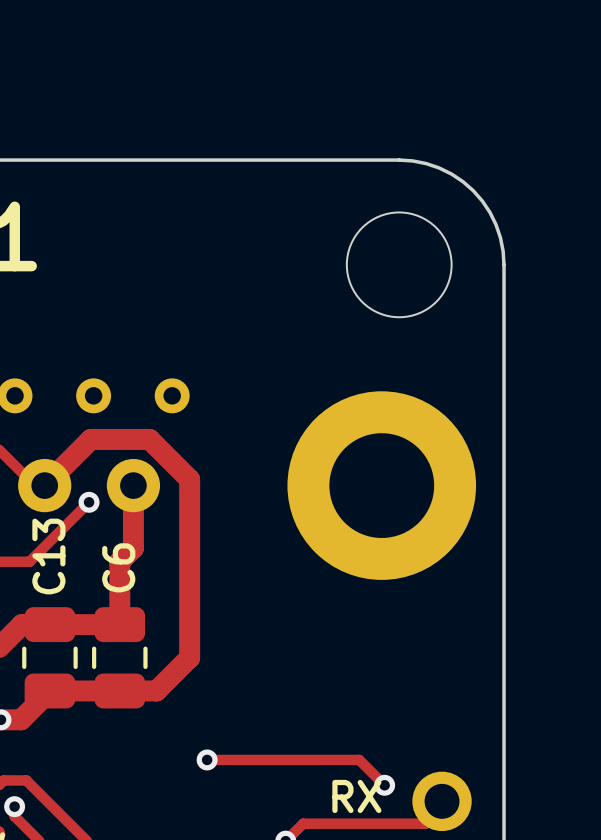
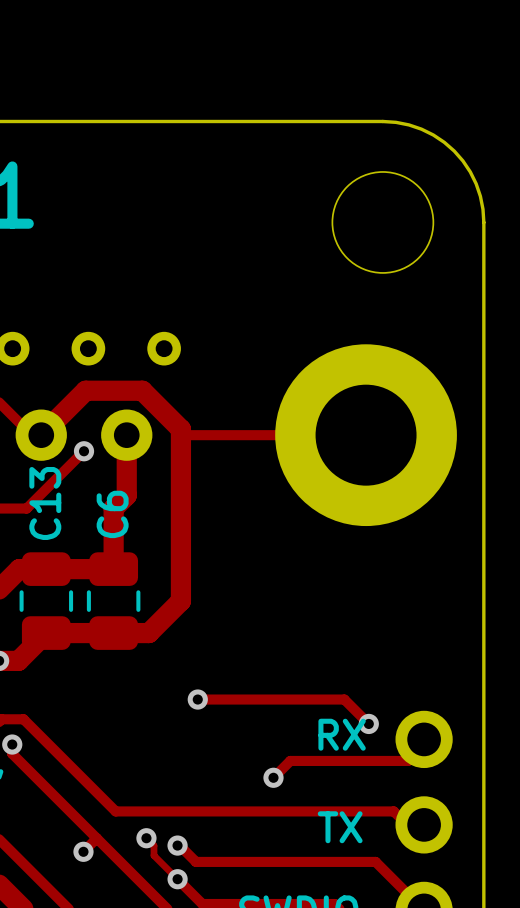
track: none -> (180, 429) (186, 435) (366, 435)

